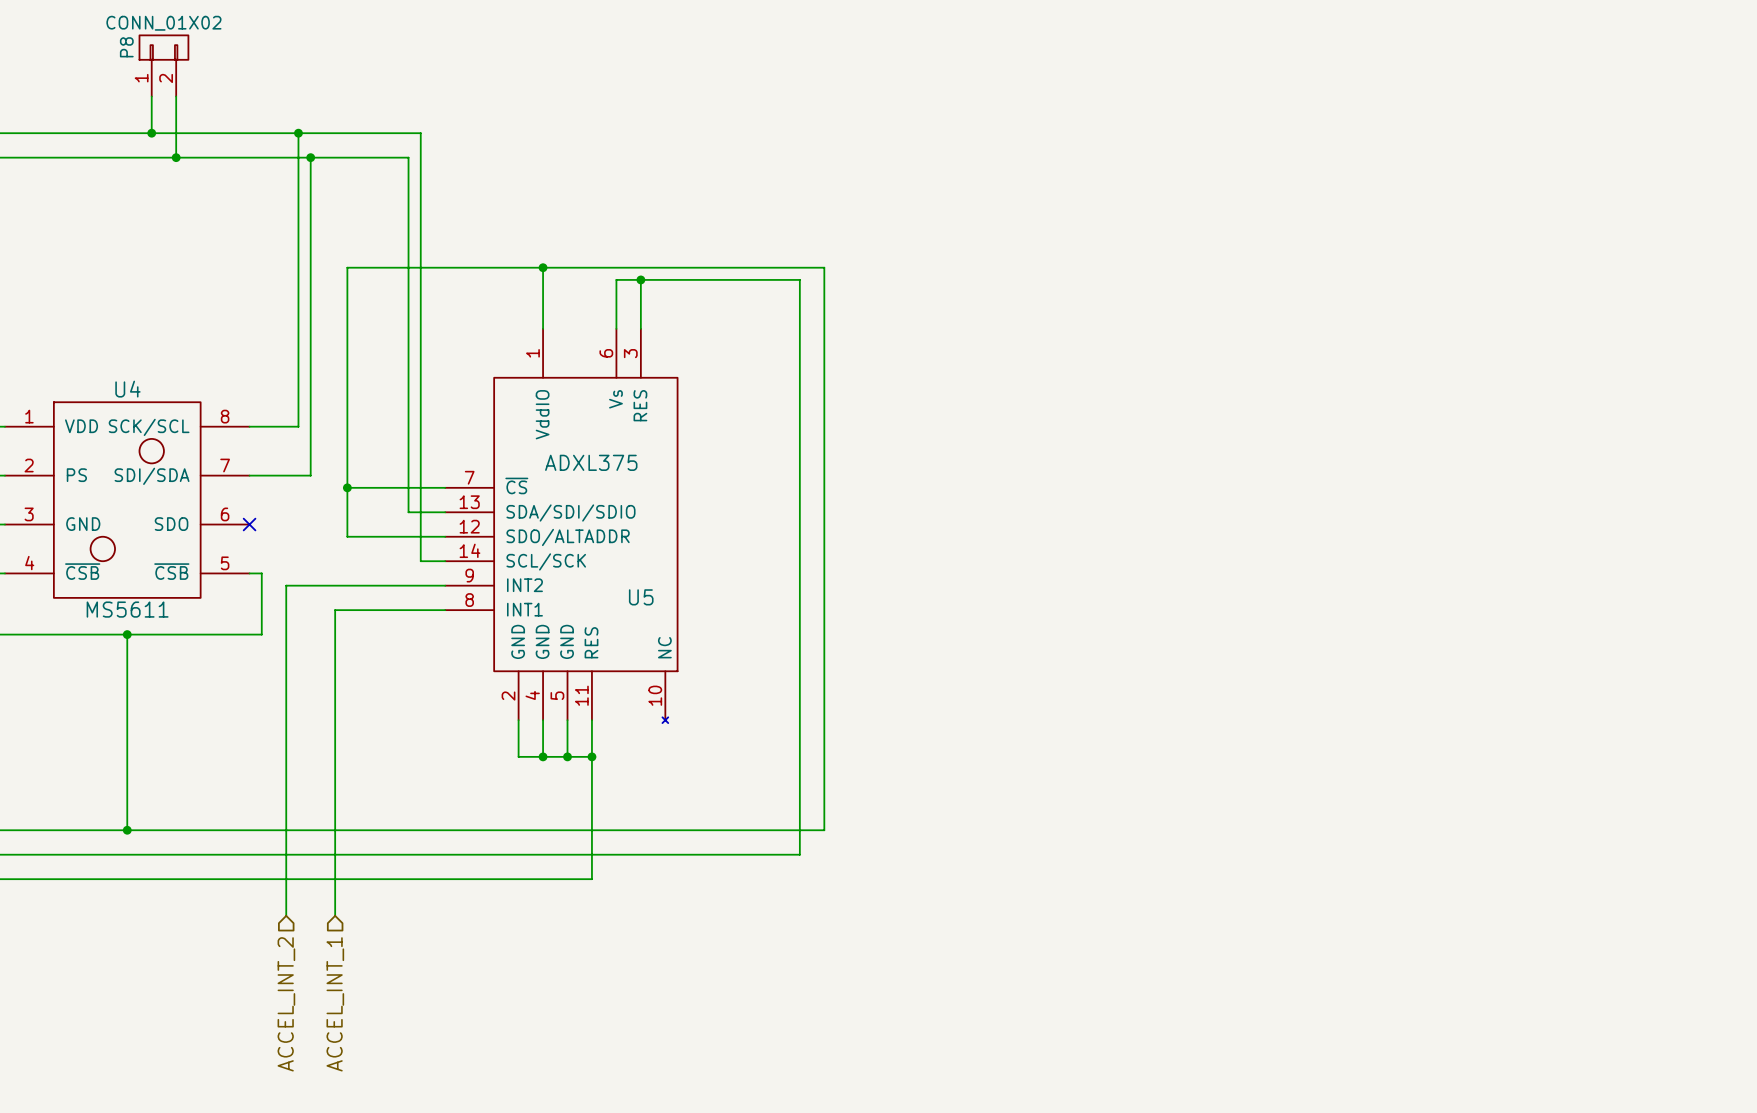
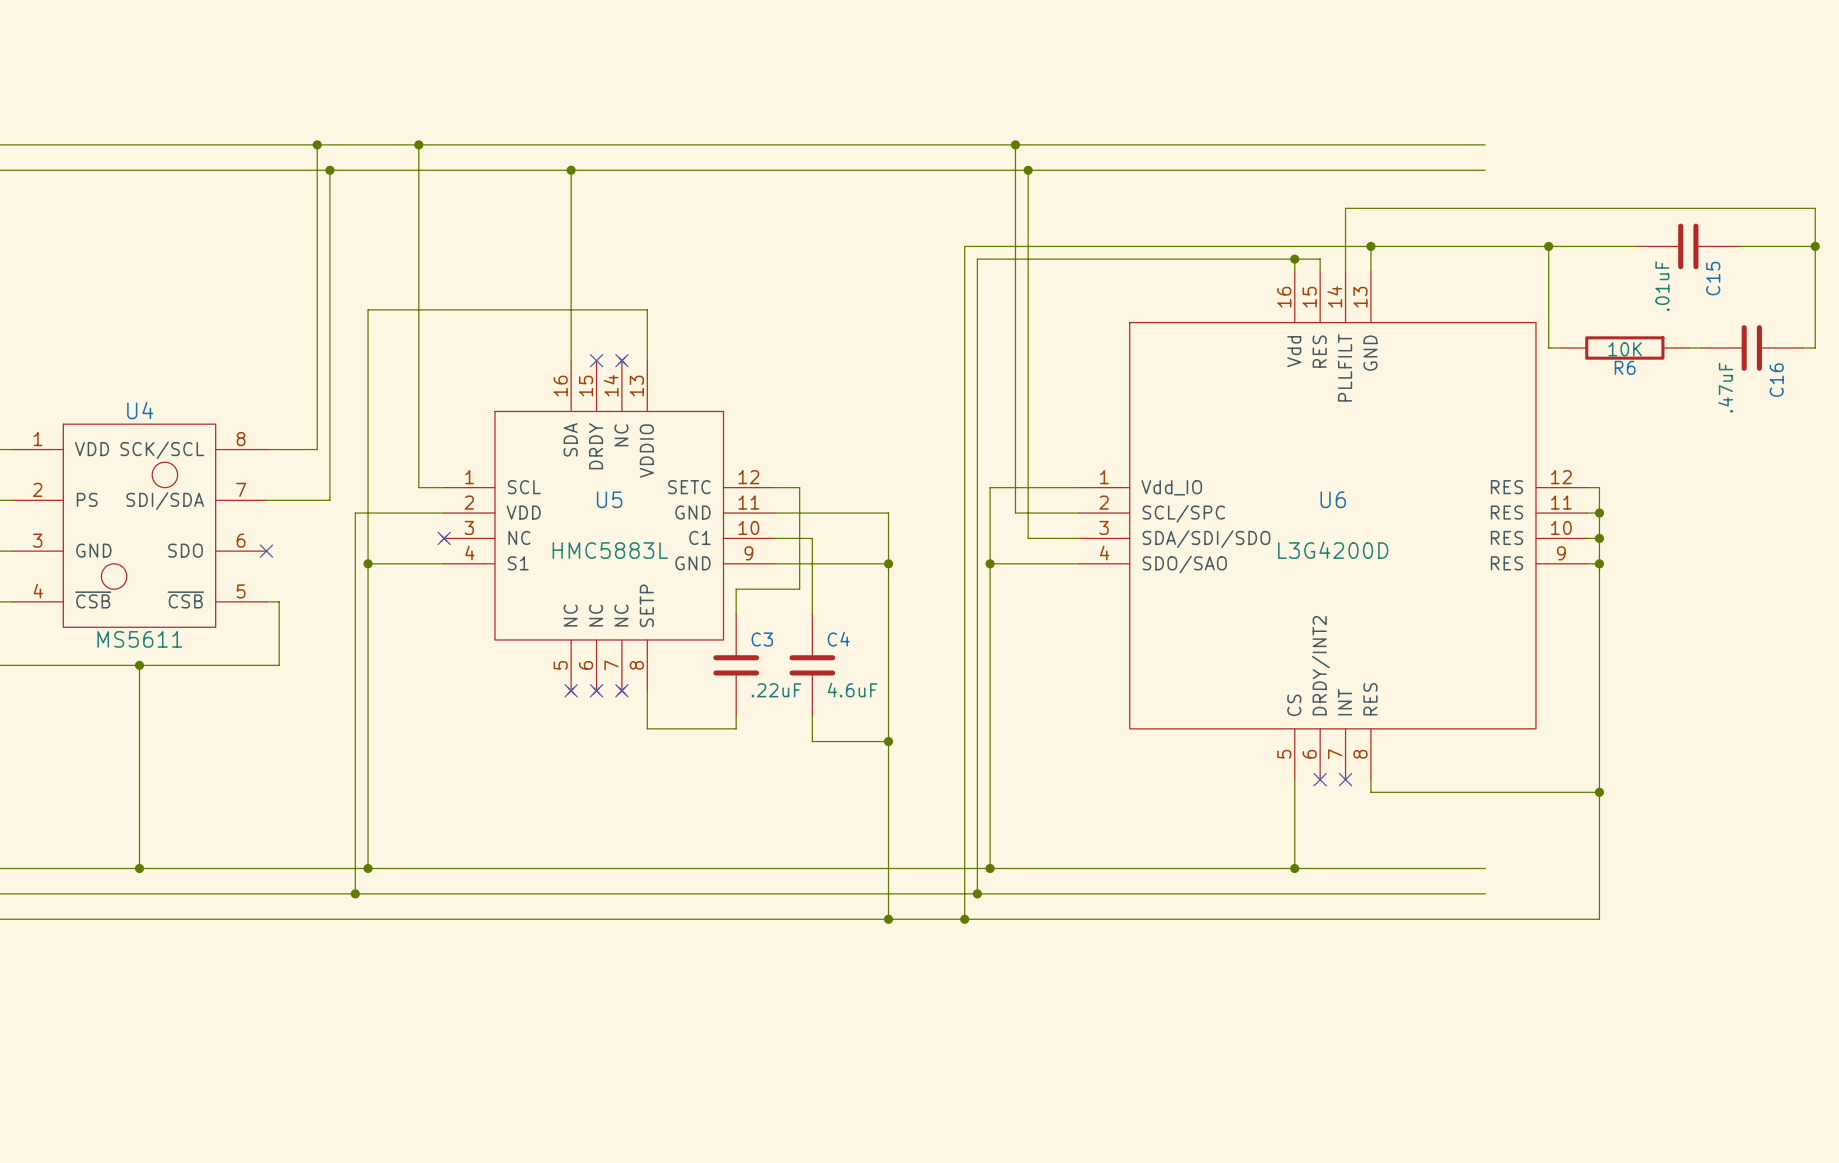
P8: CONN_01X02 (163, 65) -> none
wire: (151, 96) (151, 133) -> none
wire: (176, 96) (176, 157) -> none
junction: (151, 133) -> none
wire: none -> (418, 144) (418, 487) (444, 487)
junction: none -> (418, 144)
wire: (420, 133) (420, 561) (445, 561) -> (444, 144) (1485, 144)
wire: none -> (1015, 144) (1015, 513) (1078, 513)
junction: none -> (1015, 144)
junction: (176, 157) -> none
wire: (408, 157) (408, 512) (445, 512) -> (431, 170) (1485, 170)
wire: none -> (571, 170) (571, 284)
junction: none -> (571, 170)
wire: none -> (1028, 170) (1028, 538) (1078, 538)
junction: none -> (1028, 170)
wire: none -> (1370, 246) (1370, 271)
junction: none -> (1370, 246)
wire: none -> (1548, 246) (1548, 348) (1561, 348)
junction: none -> (1548, 246)
wire: none -> (1637, 246) (964, 246) (964, 919)
C15: none -> .01uF (1688, 246)
wire: none -> (1739, 246) (1815, 246)
junction: none -> (1815, 246)
wire: none -> (1294, 259) (1294, 271)
junction: none -> (1294, 259)
wire: none -> (1320, 271) (1320, 259) (977, 259) (977, 893)
wire: none -> (1345, 271) (1345, 208) (1815, 208) (1815, 348) (1802, 348)
junction: (543, 267) -> none
wire: (640, 279) (640, 328) -> none
junction: (640, 279) -> none
wire: (347, 292) (347, 267) (824, 267) (824, 830) -> (368, 309) (647, 309)
wire: (616, 292) (616, 279) (799, 279) (799, 854) -> (1485, 893) (837, 893)
U5 symbol: [445, 328, 678, 724] -> [441, 357, 775, 694]
R6: none -> 10K (1624, 348)
wire: none -> (1688, 348) (1701, 348)
C16: none -> .47uF (1751, 348)
no-connect mark: none -> (596, 360)
no-connect mark: none -> (621, 360)
U5 value: ADXL375 (591, 462) -> HMC5883L (610, 550)
wire: none -> (774, 487) (799, 487) (799, 589) (736, 589) (736, 614)
wire: none -> (1078, 487) (990, 487) (990, 868)
junction position: (347, 487) -> (368, 563)
wire: none -> (774, 513) (888, 513) (888, 919)
wire: none -> (1586, 513) (1599, 513)
junction: none -> (1599, 513)
U6: none -> L3G4200D (1332, 525)
no-connect mark: none -> (444, 538)
wire: none -> (774, 538) (812, 538) (812, 614)
wire: none -> (1586, 538) (1599, 538)
junction: none -> (1599, 538)
wire: none -> (368, 563) (368, 868)
wire: none -> (774, 563) (888, 563)
junction: none -> (888, 563)
wire: none -> (990, 563) (1078, 563)
junction: none -> (990, 563)
wire: none -> (1586, 563) (1599, 563)
junction: none -> (1599, 563)
wire: (445, 585) (286, 585) (286, 915) -> none
U5 name position: U5 (641, 597) -> U5 (609, 499)
wire: (335, 610) (445, 610) -> (355, 639) (355, 513) (368, 513)
C3: none -> .22uF (736, 665)
C4: none -> 4.6uF (812, 665)
no-connect mark: none -> (571, 690)
no-connect mark: none -> (596, 690)
no-connect mark: none -> (621, 690)
wire: none -> (647, 690) (647, 728) (736, 728) (736, 716)
wire: none -> (812, 716) (812, 741) (888, 741)
junction: none -> (888, 741)
wire: (518, 720) (518, 756) (591, 756) -> none
wire: (543, 720) (543, 756) -> none
wire: (567, 720) (567, 756) -> none
wire: (591, 720) (591, 879) -> (1586, 487) (1599, 487) (1599, 919) (621, 919)
wire: none -> (1294, 779) (1294, 868)
no-connect mark: none -> (1320, 779)
no-connect mark: none -> (1345, 779)
wire: none -> (1370, 779) (1370, 792) (1599, 792)
junction: (543, 756) -> none
junction: (567, 756) -> none
junction: (591, 756) -> none
junction: none -> (1599, 792)
junction: none -> (368, 868)
wire: none -> (863, 868) (1485, 868)
junction: none -> (990, 868)
junction: none -> (1294, 868)
wire: (335, 854) (335, 915) -> none
junction: none -> (355, 893)
junction: none -> (977, 893)
junction: none -> (888, 919)
junction: none -> (964, 919)
hierarchical label: ACCEL_INT_2 (286, 1004) -> none
hierarchical label: ACCEL_INT_1 (335, 1004) -> none

